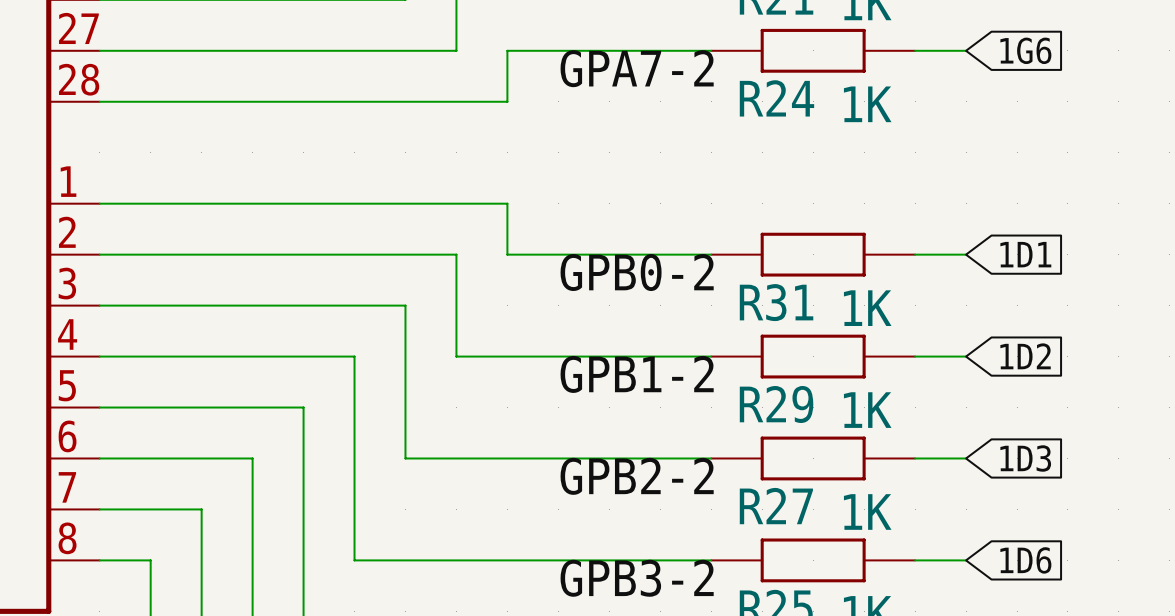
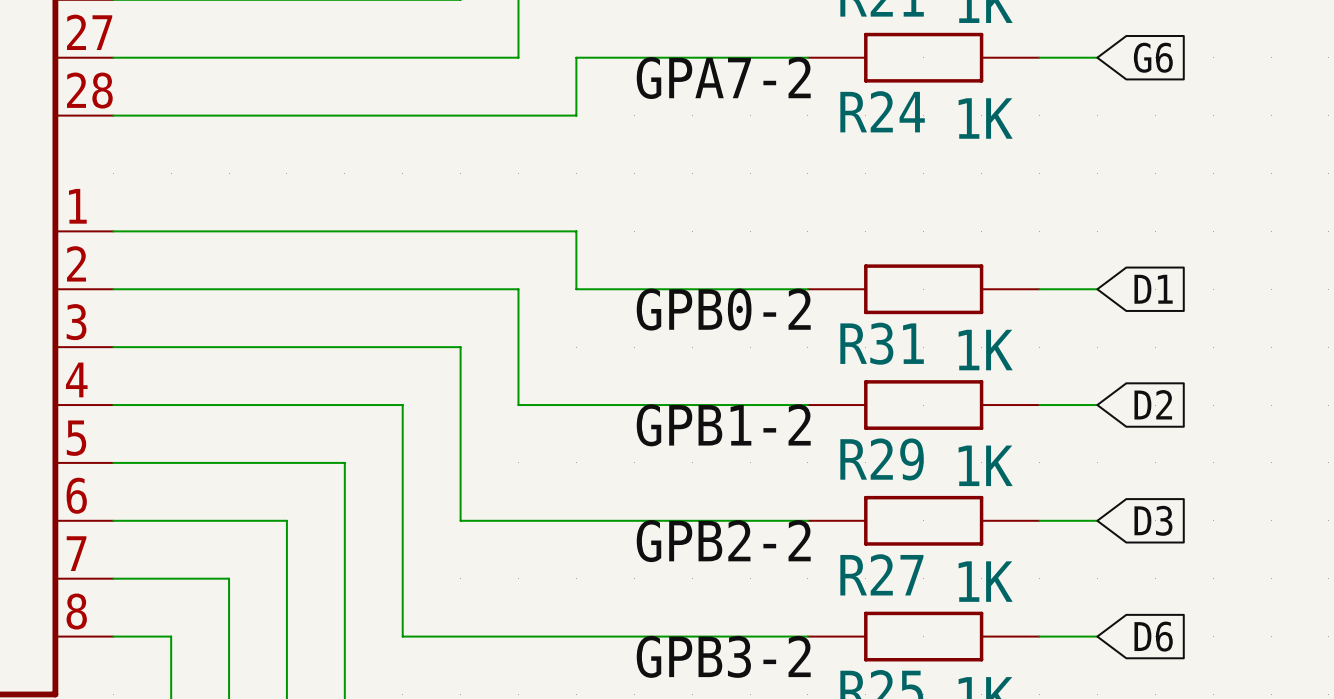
global label: 1G6 (1025, 50) -> G6 (1153, 57)
global label: 1D1 (1025, 254) -> D1 (1153, 289)
global label: 1D2 (1025, 356) -> D2 (1153, 404)
global label: 1D3 (1025, 458) -> D3 (1153, 520)
global label: 1D6 (1025, 560) -> D6 (1153, 636)

